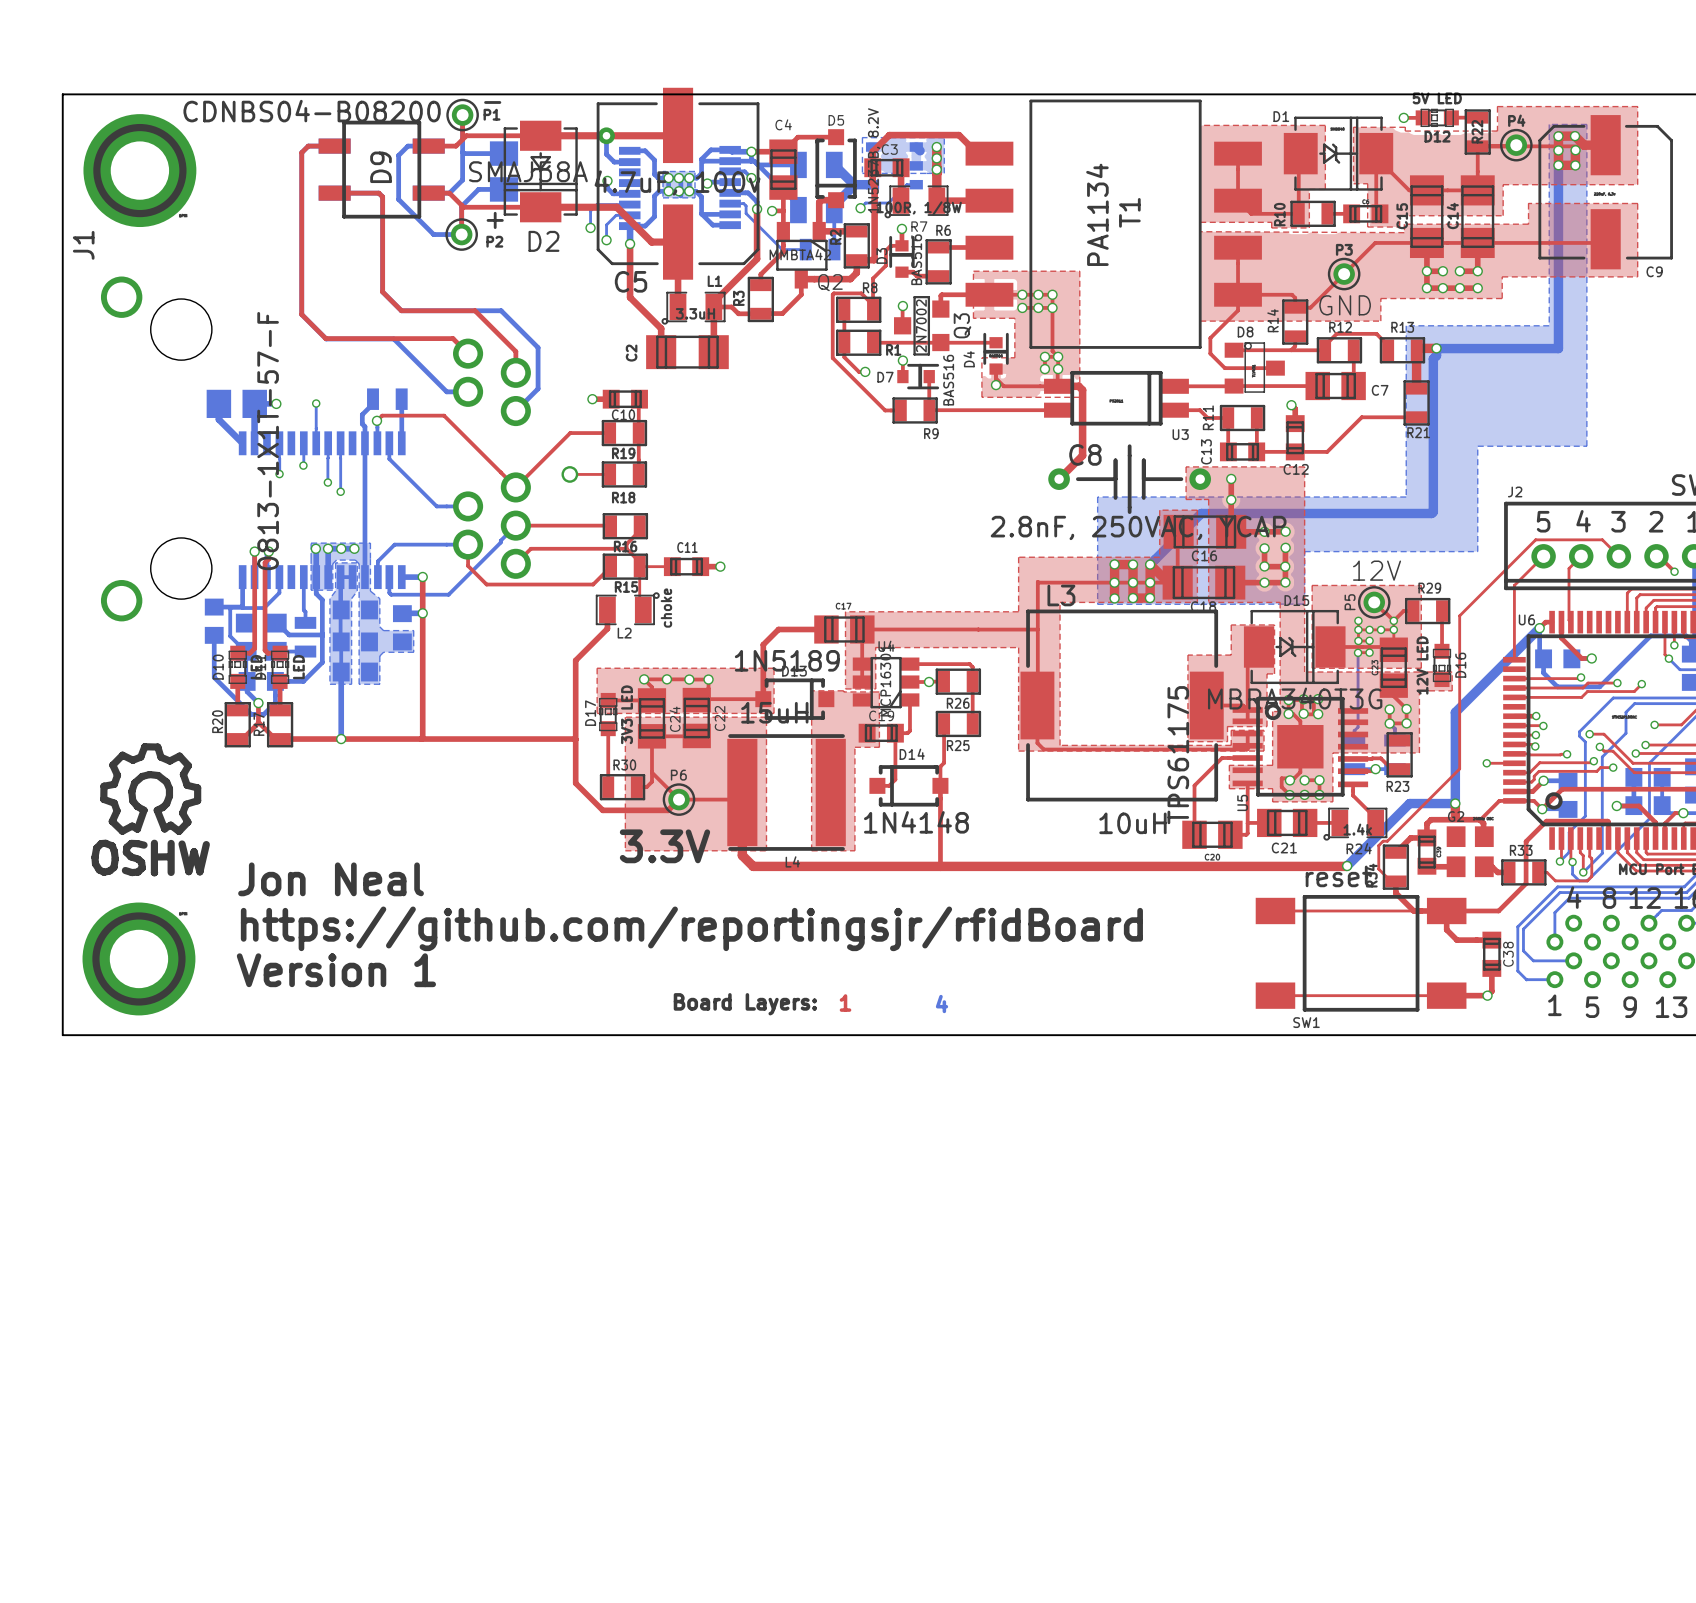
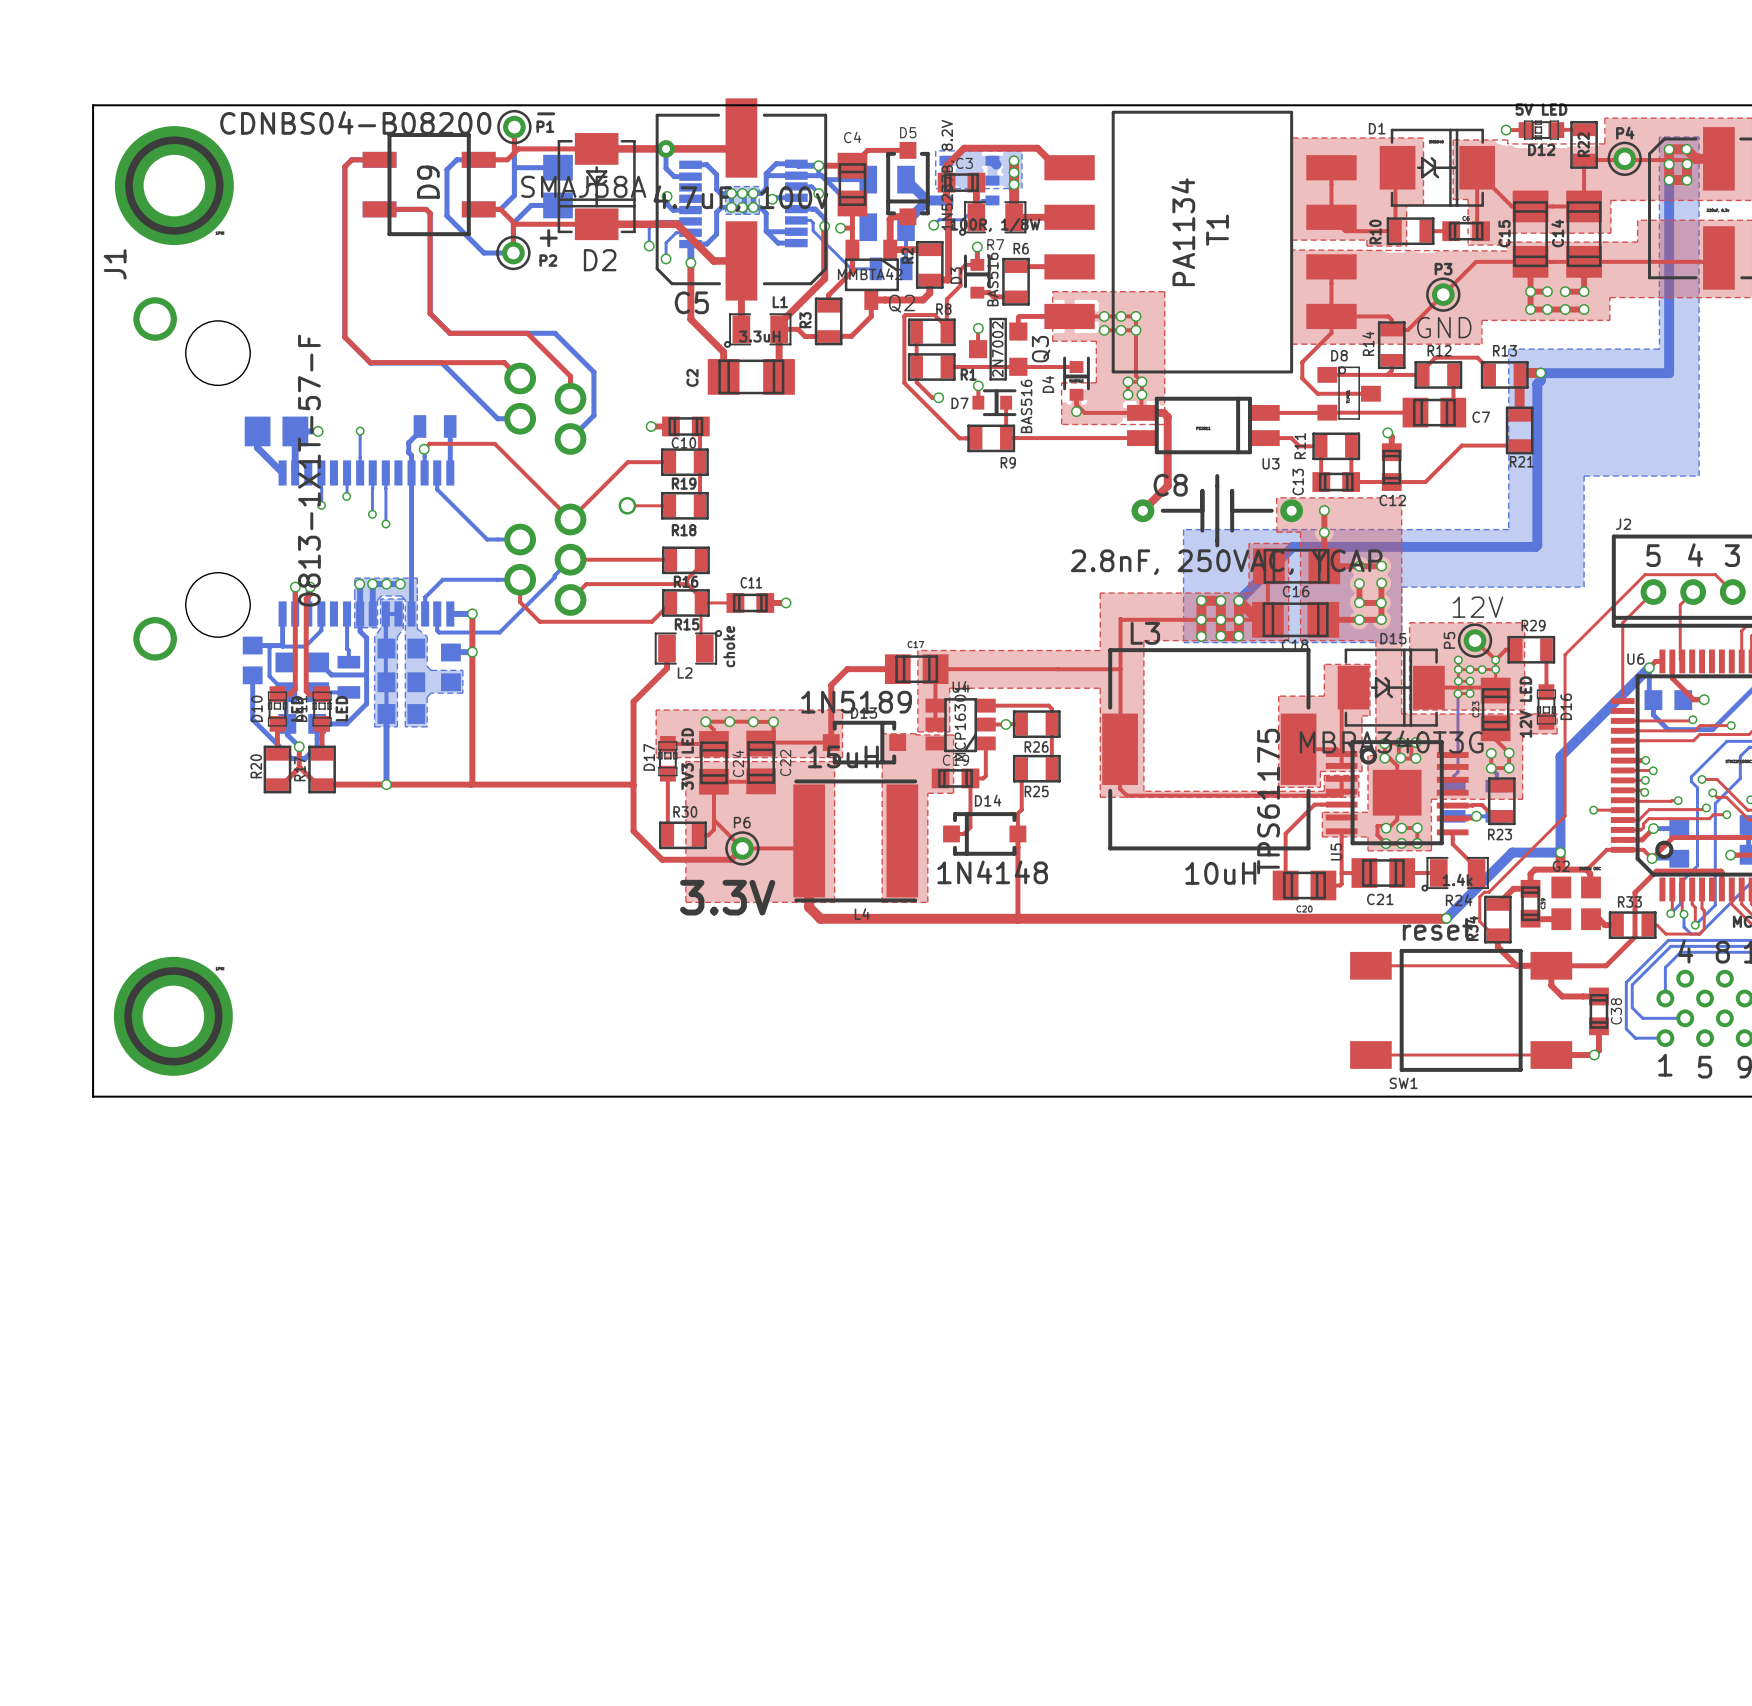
drawing: [91, 743, 210, 877] -> none
text: Jon Neal (331, 879) -> none
text: https://github.com/reportingsjr/rfidBoard (691, 928) -> none
text: Version 1 (336, 970) -> none
text: 1 (845, 1003) -> none
text: Board Layers: (745, 1004) -> none
text: 4 (942, 1004) -> none

